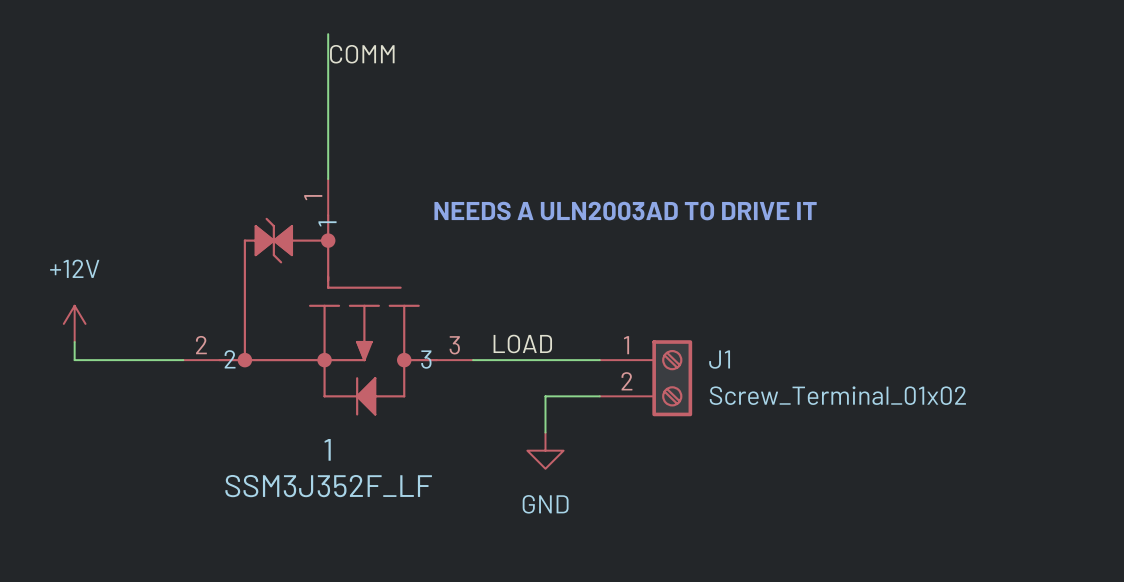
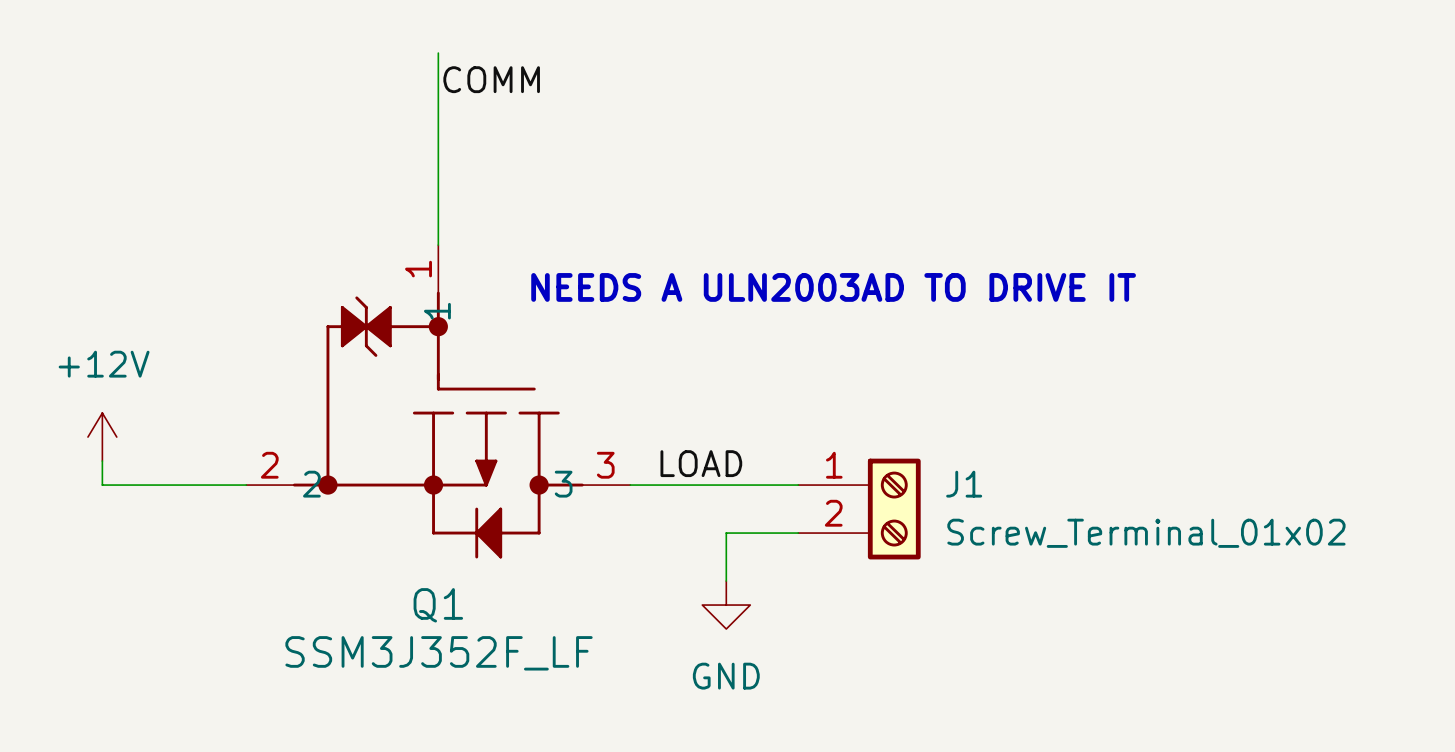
1 name: 1 (327, 449) -> Q1 (438, 605)

